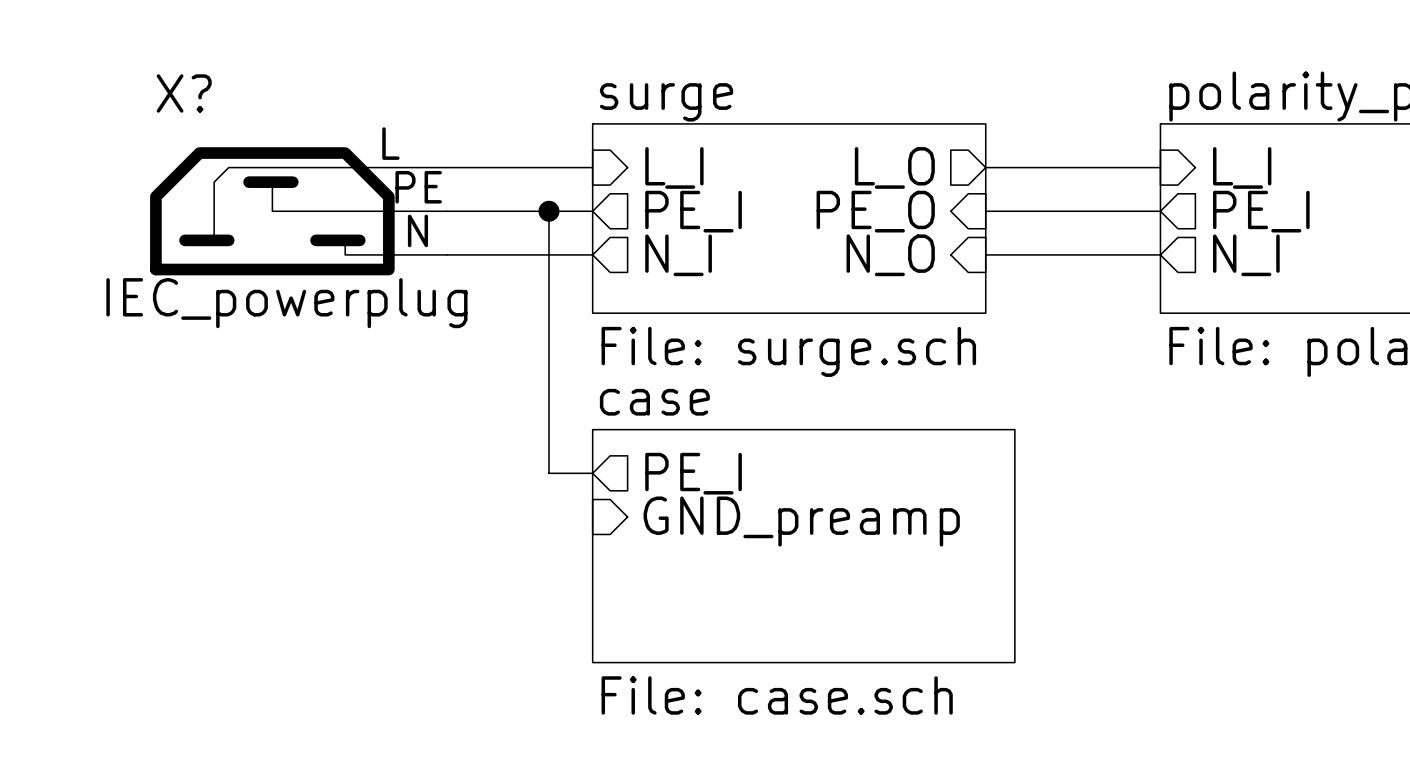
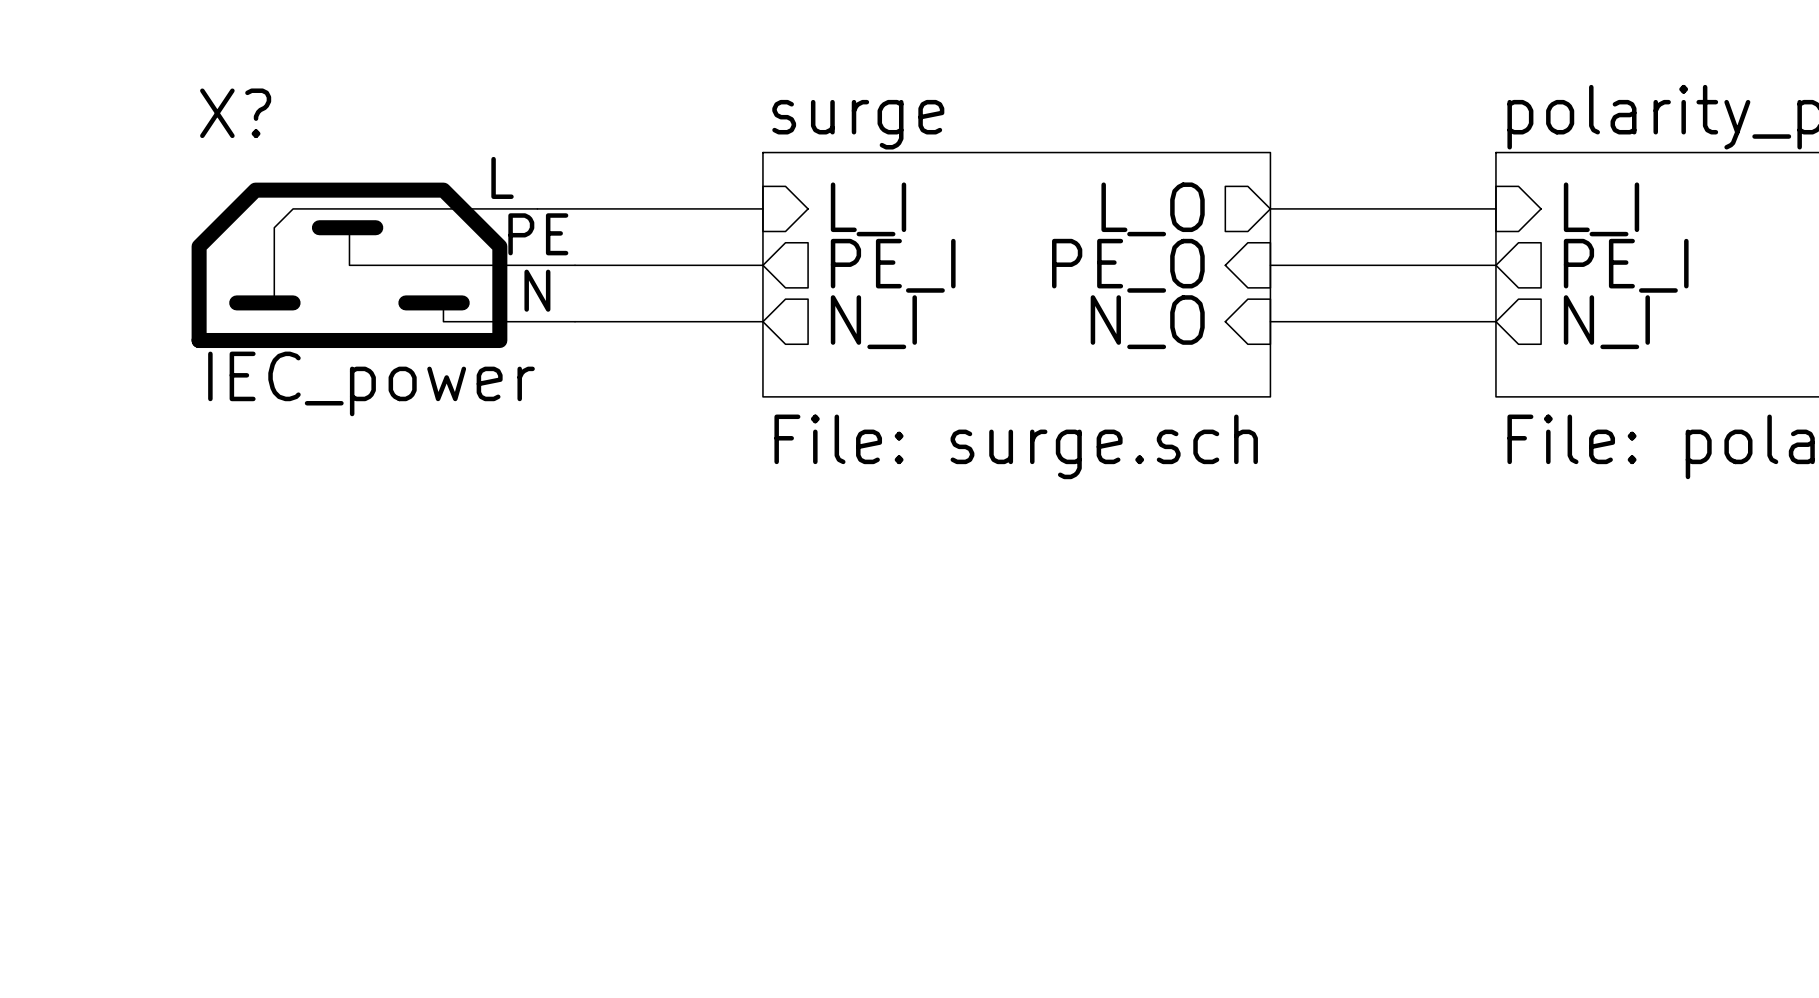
wire: (548, 211) (548, 473) (592, 473) -> none
junction: (548, 211) -> none
X? value: IEC_powerplug (286, 303) -> IEC_power (371, 383)
sheet pin: PE_I (693, 473) -> none
sheet pin: GND_preamp (801, 521) -> none
sheet case: File: case.sch (803, 546) -> none

